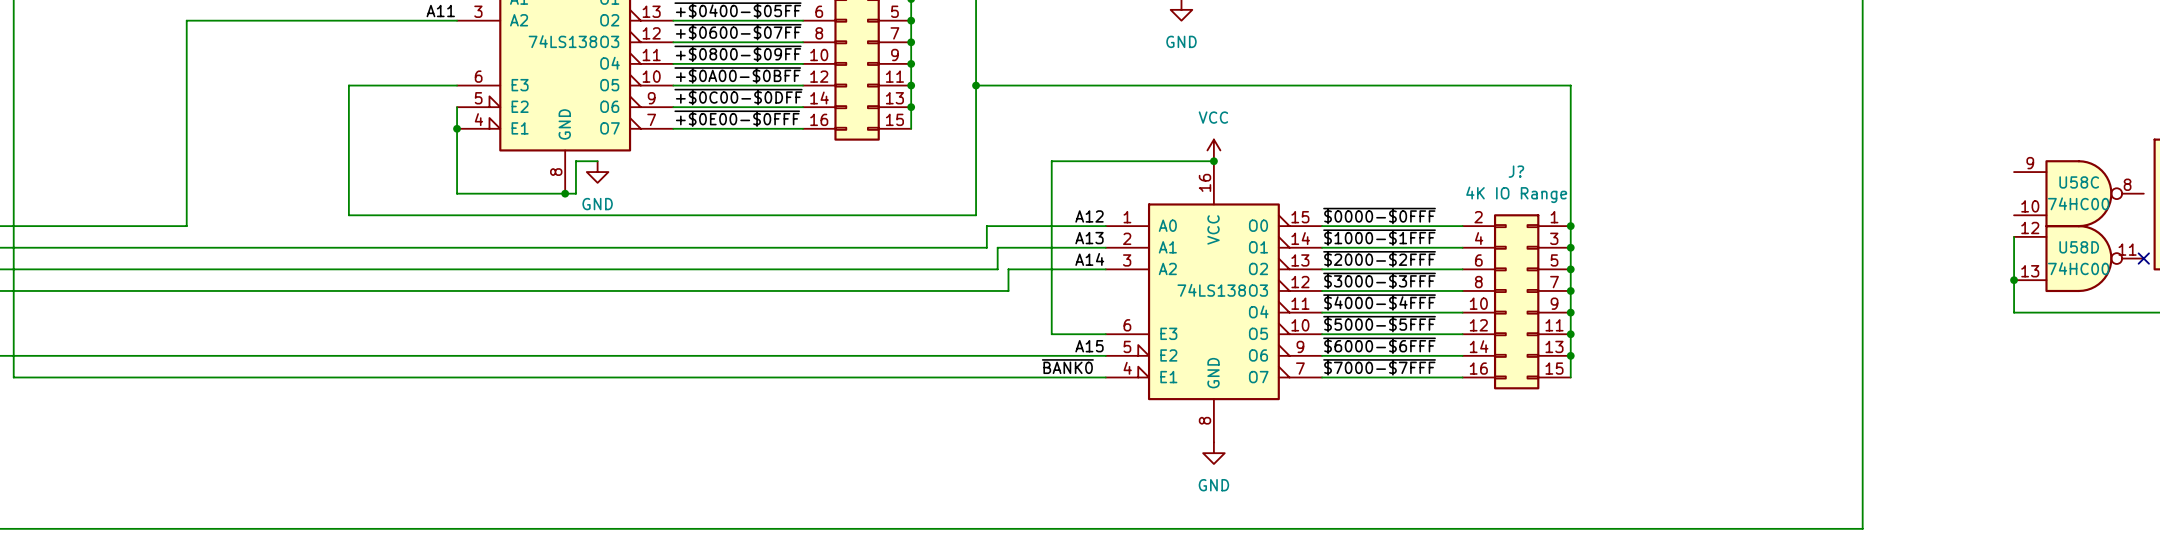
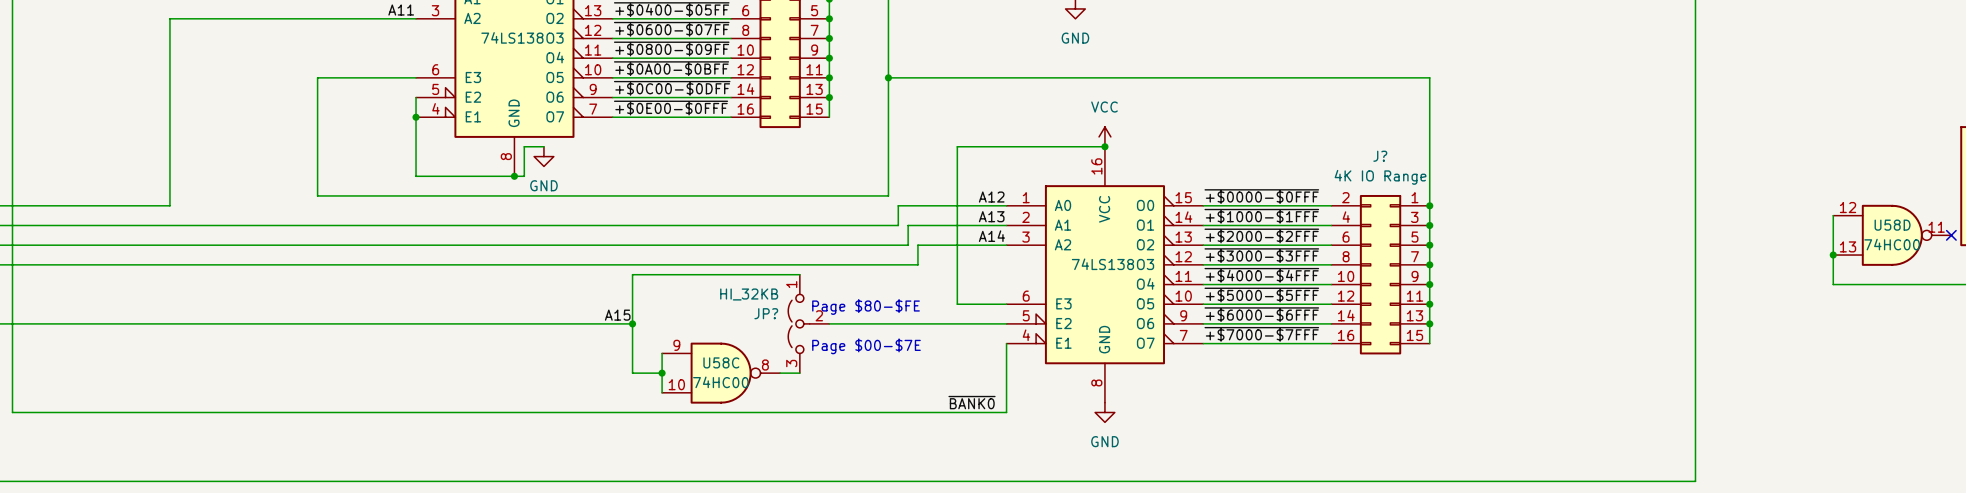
U58C position: (2078, 193) -> (721, 373)
label: ~{$0000-$0FFF} (1379, 215) -> ~{+$0000-$0FFF} (1261, 196)
label: ~{$1000-$1FFF} (1379, 237) -> ~{+$1000-$1FFF} (1261, 216)
label: ~{$2000-$2FFF} (1379, 259) -> ~{+$2000-$2FFF} (1261, 235)
label: ~{$3000-$3FFF} (1379, 280) -> ~{+$3000-$3FFF} (1261, 255)
wire: none -> (799, 274) (632, 274) (632, 373) (662, 373)
label: ~{$4000-$4FFF} (1379, 302) -> ~{+$4000-$4FFF} (1261, 275)
label: ~{$5000-$5FFF} (1379, 324) -> ~{+$5000-$5FFF} (1261, 295)
text: none -> Page $80-$FE (866, 306)
label: ~{$6000-$6FFF} (1379, 345) -> ~{+$6000-$6FFF} (1261, 314)
label: none -> A15 (617, 315)
label: A15 (1089, 346) -> none
wire: (694, 355) (911, 355) -> none
junction: none -> (632, 323)
JP?: none -> HI_32KB (808, 323)
label position: ~{BANK0} (1067, 366) -> ~{BANK0} (972, 402)
label: ~{$7000-$7FFF} (1379, 367) -> ~{+$7000-$7FFF} (1261, 334)
wire: (13, 377) (1105, 377) -> (12, 343) (12, 412) (1006, 412) (1006, 343)
text: none -> Page $00-$7E (866, 346)
wire: none -> (662, 353) (662, 392)
junction: none -> (662, 373)
wire: none -> (780, 373) (799, 373)

